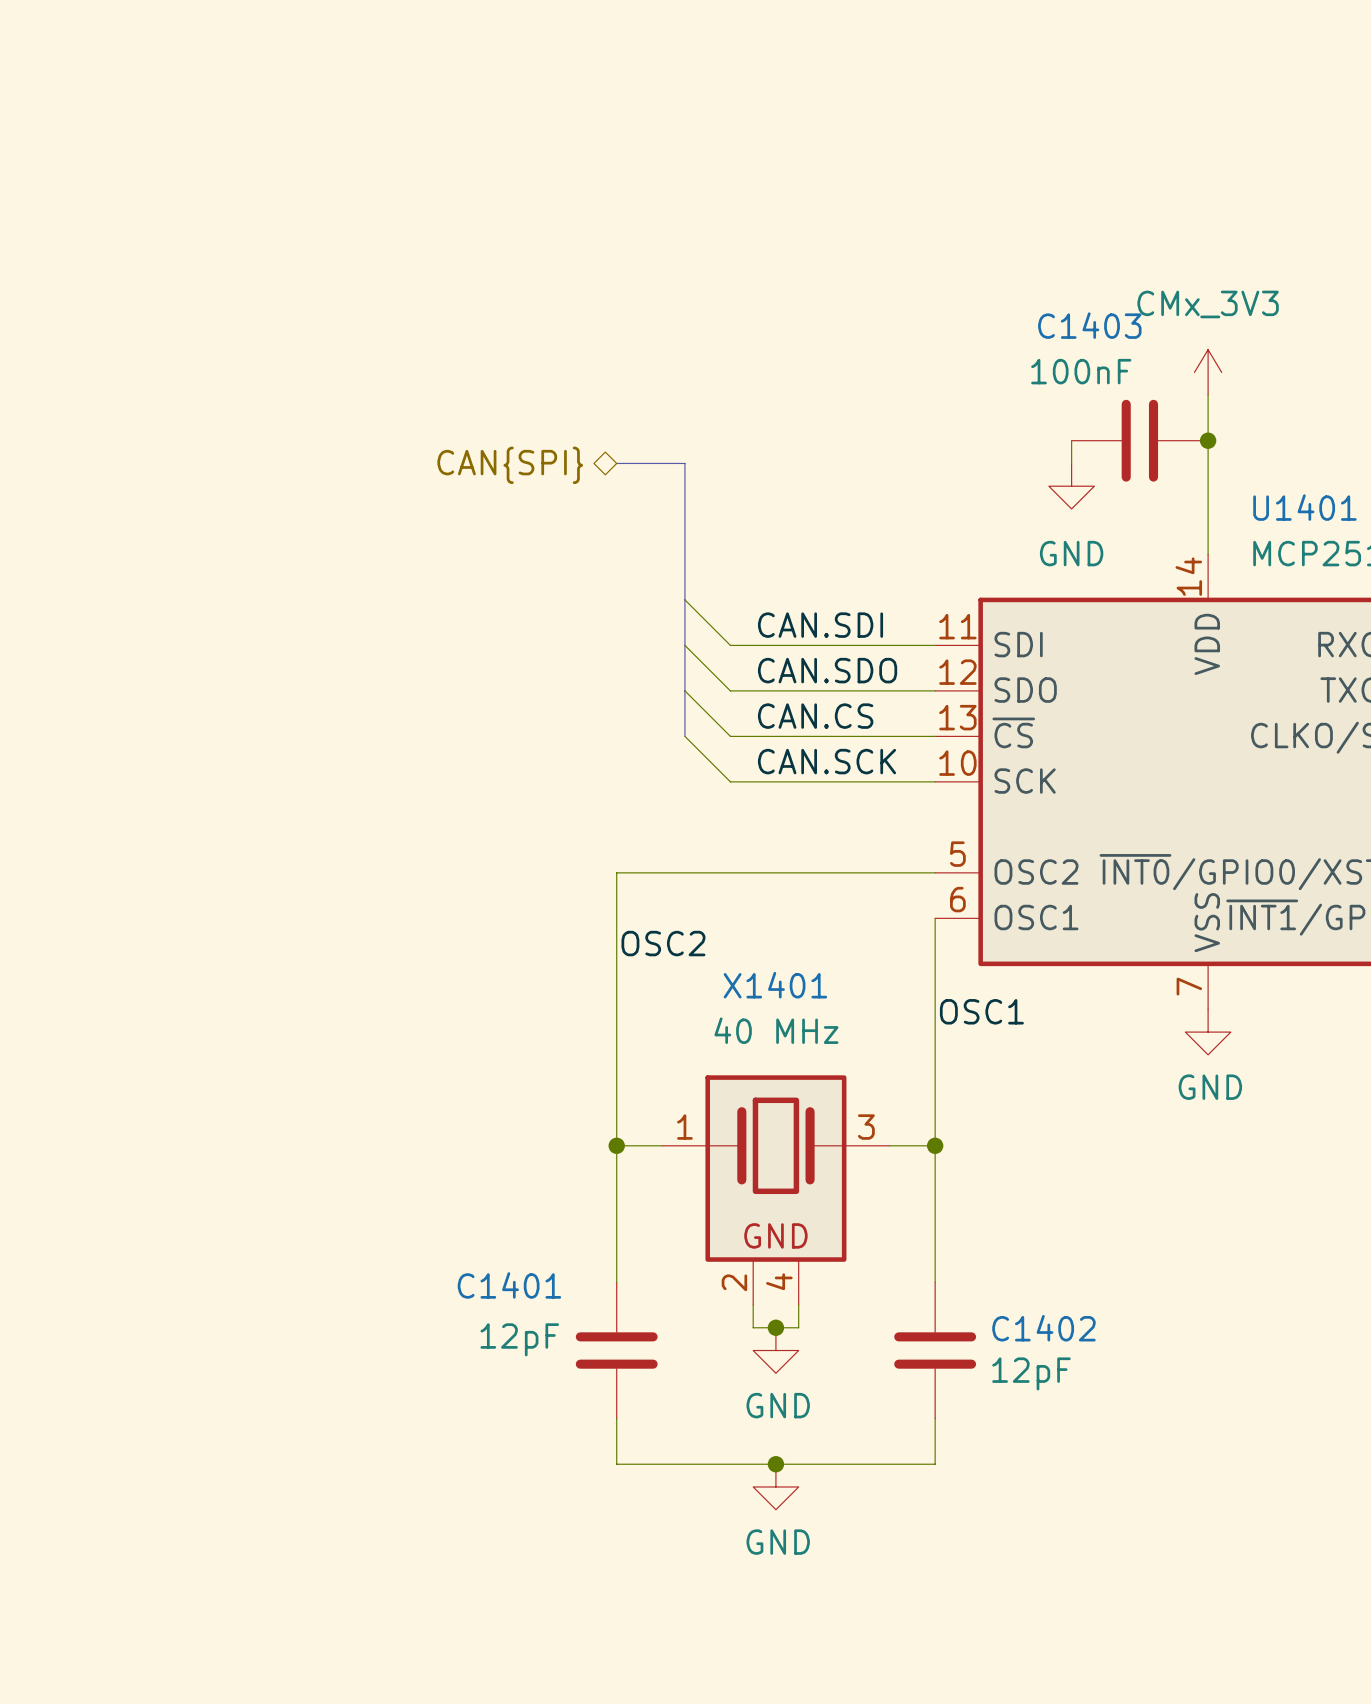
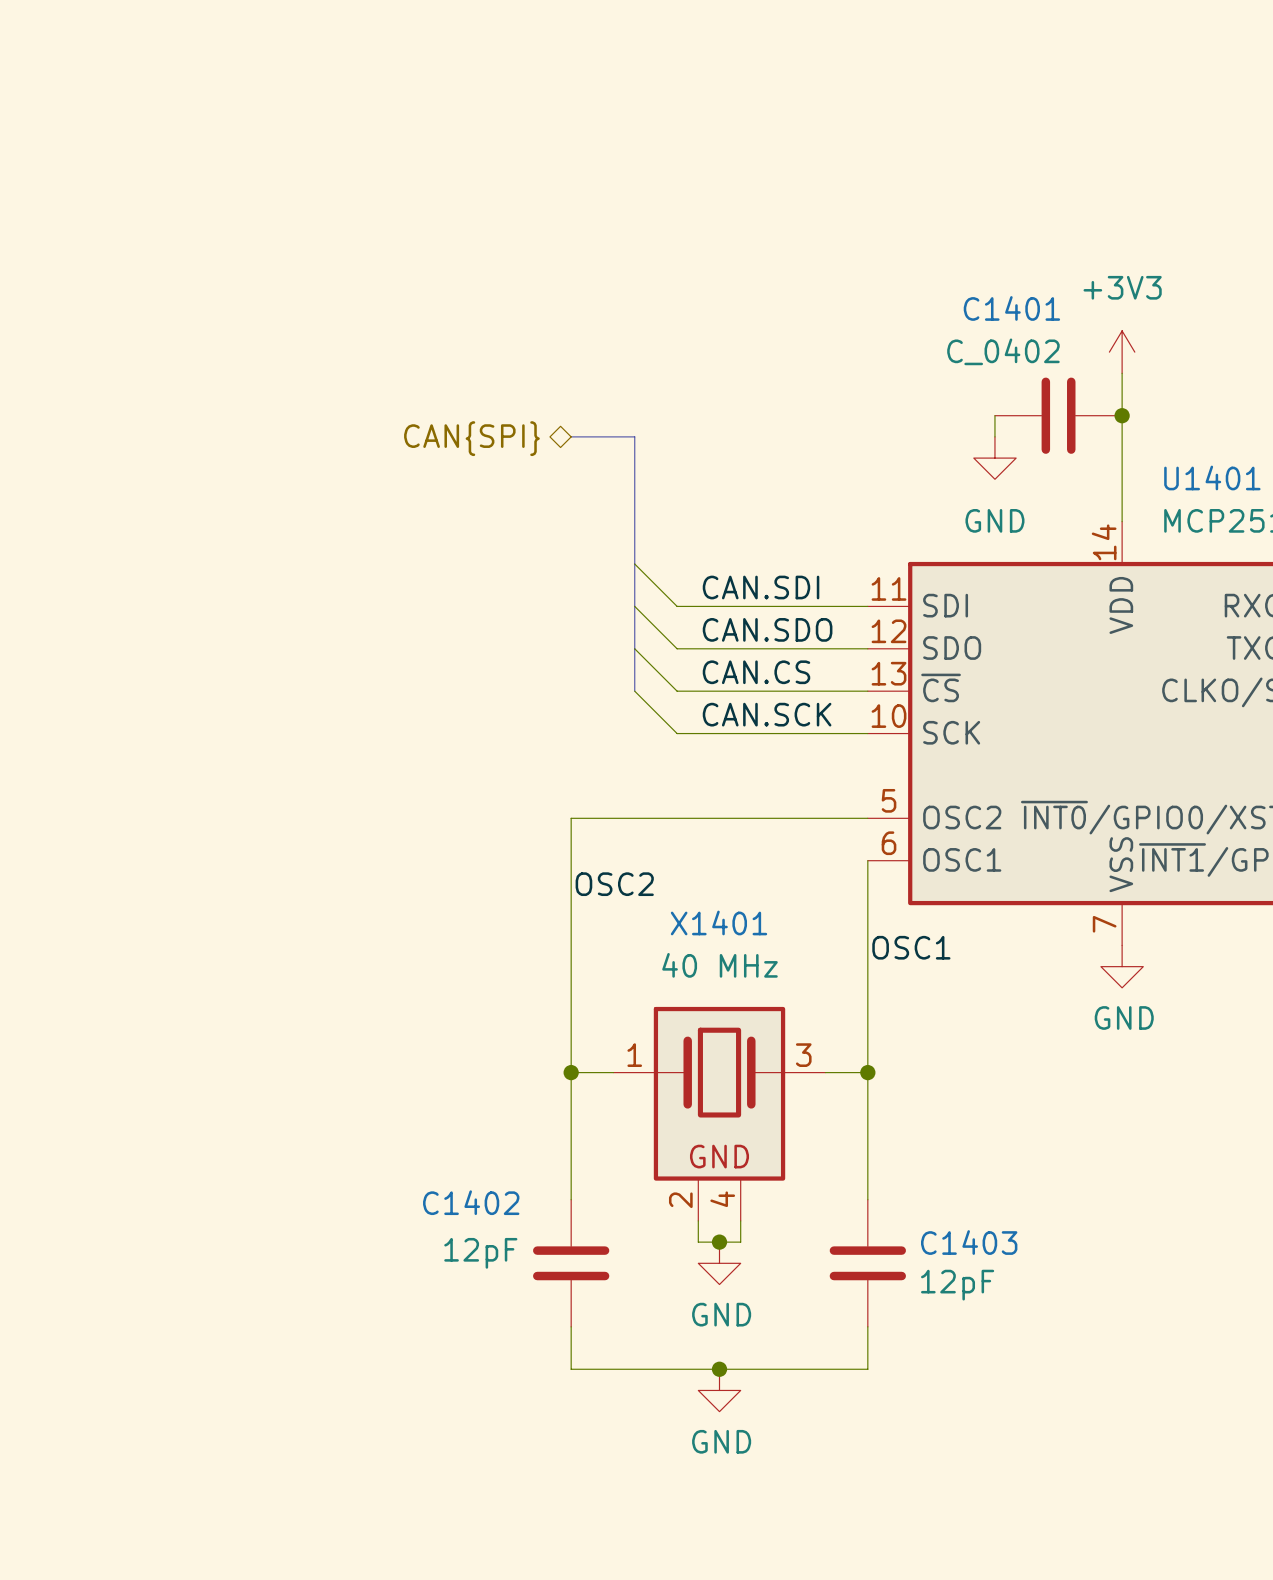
C1403 name: C1403 (1089, 325) -> C1401 (1011, 308)
C1403 value: 100nF (1081, 371) -> C_0402 (1003, 351)
power symbol: CMx_3V3 (1208, 372) -> +3V3 (1122, 352)
C1401 name: C1401 (509, 1285) -> C1402 (471, 1202)
C1402 name: C1402 (1043, 1328) -> C1403 (969, 1242)

